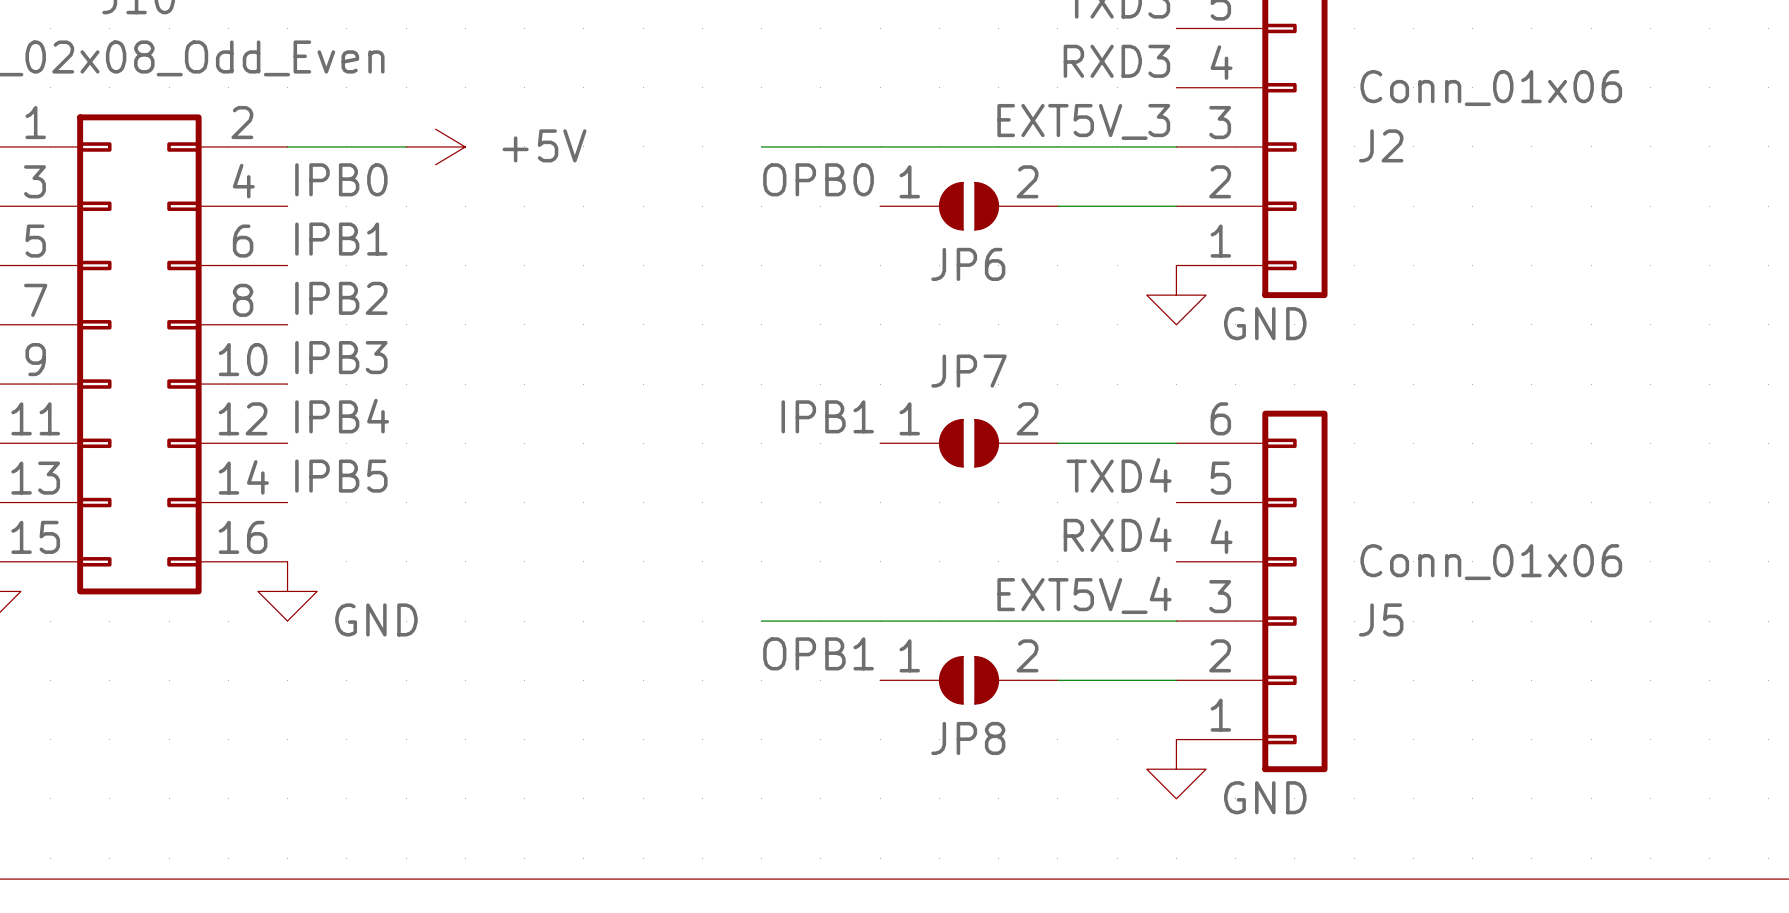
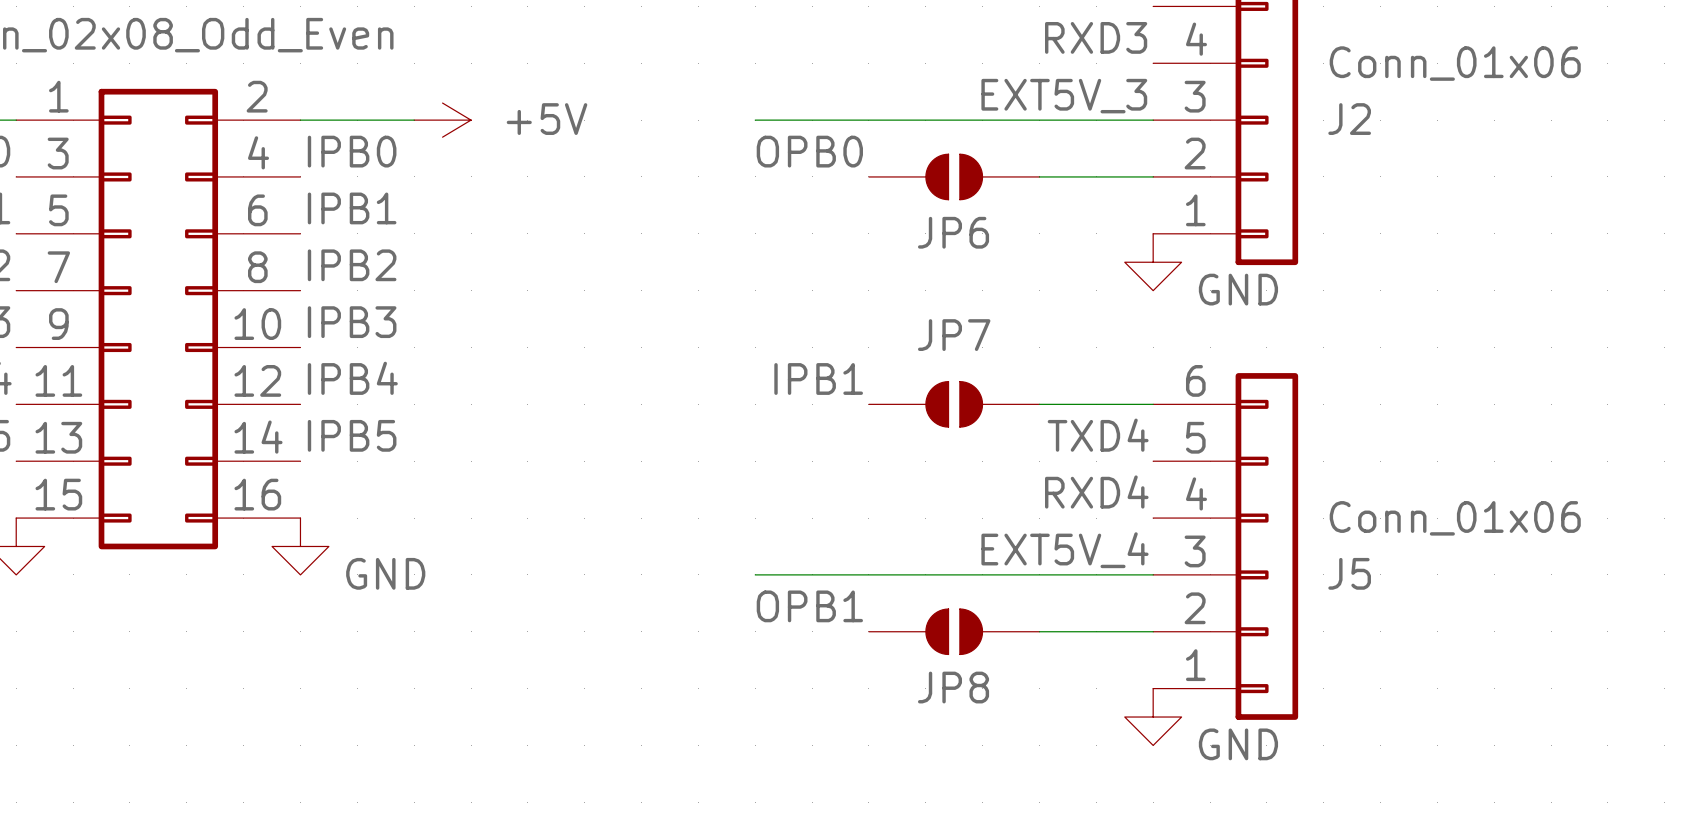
JP6 pin number: 1 (909, 181) -> none
JP6 pin number: 2 (1027, 181) -> none
JP7 pin number: 1 (909, 418) -> none
JP7 pin number: 2 (1027, 418) -> none
JP8 pin number: 1 (909, 655) -> none
JP8 pin number: 2 (1027, 655) -> none

